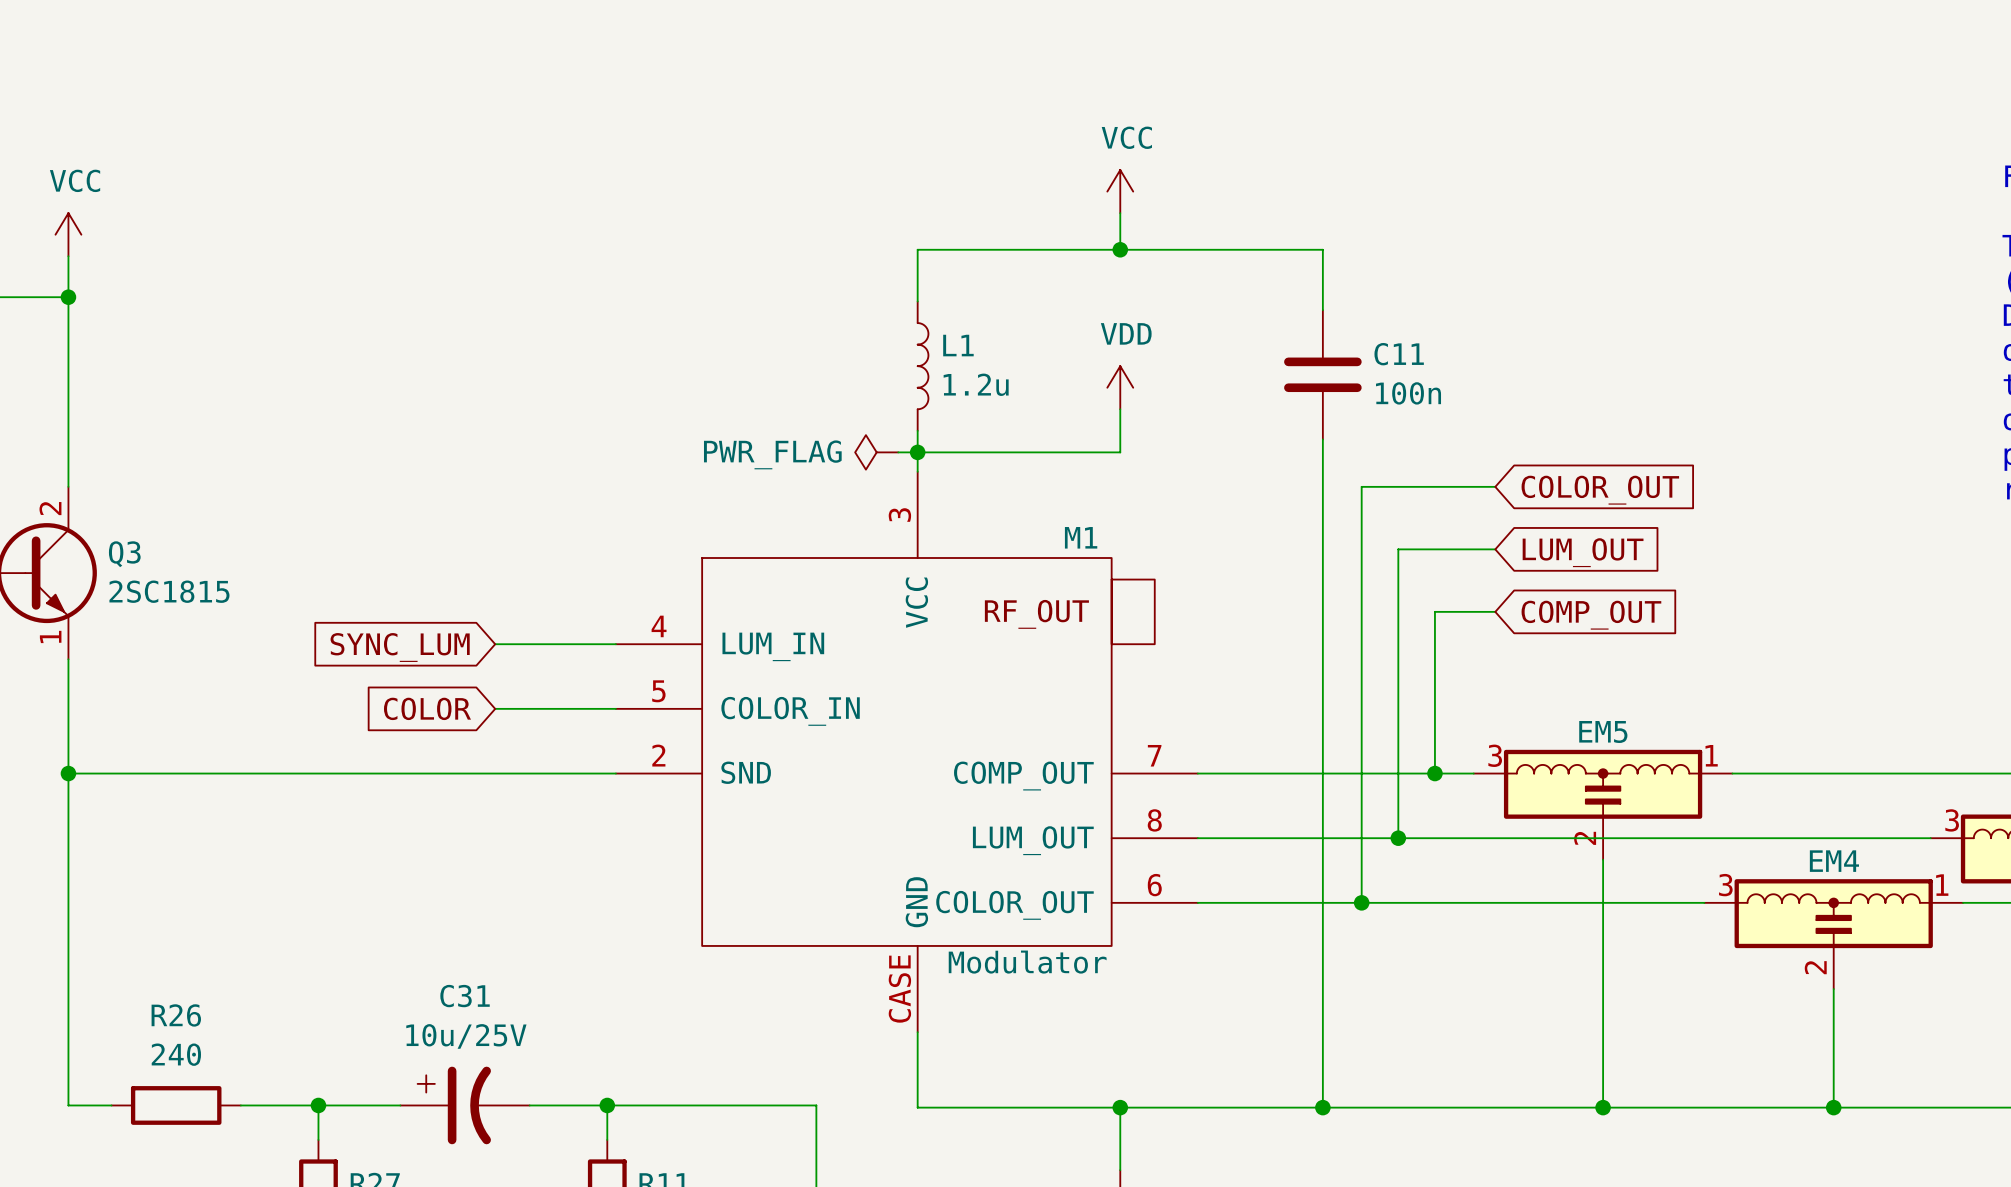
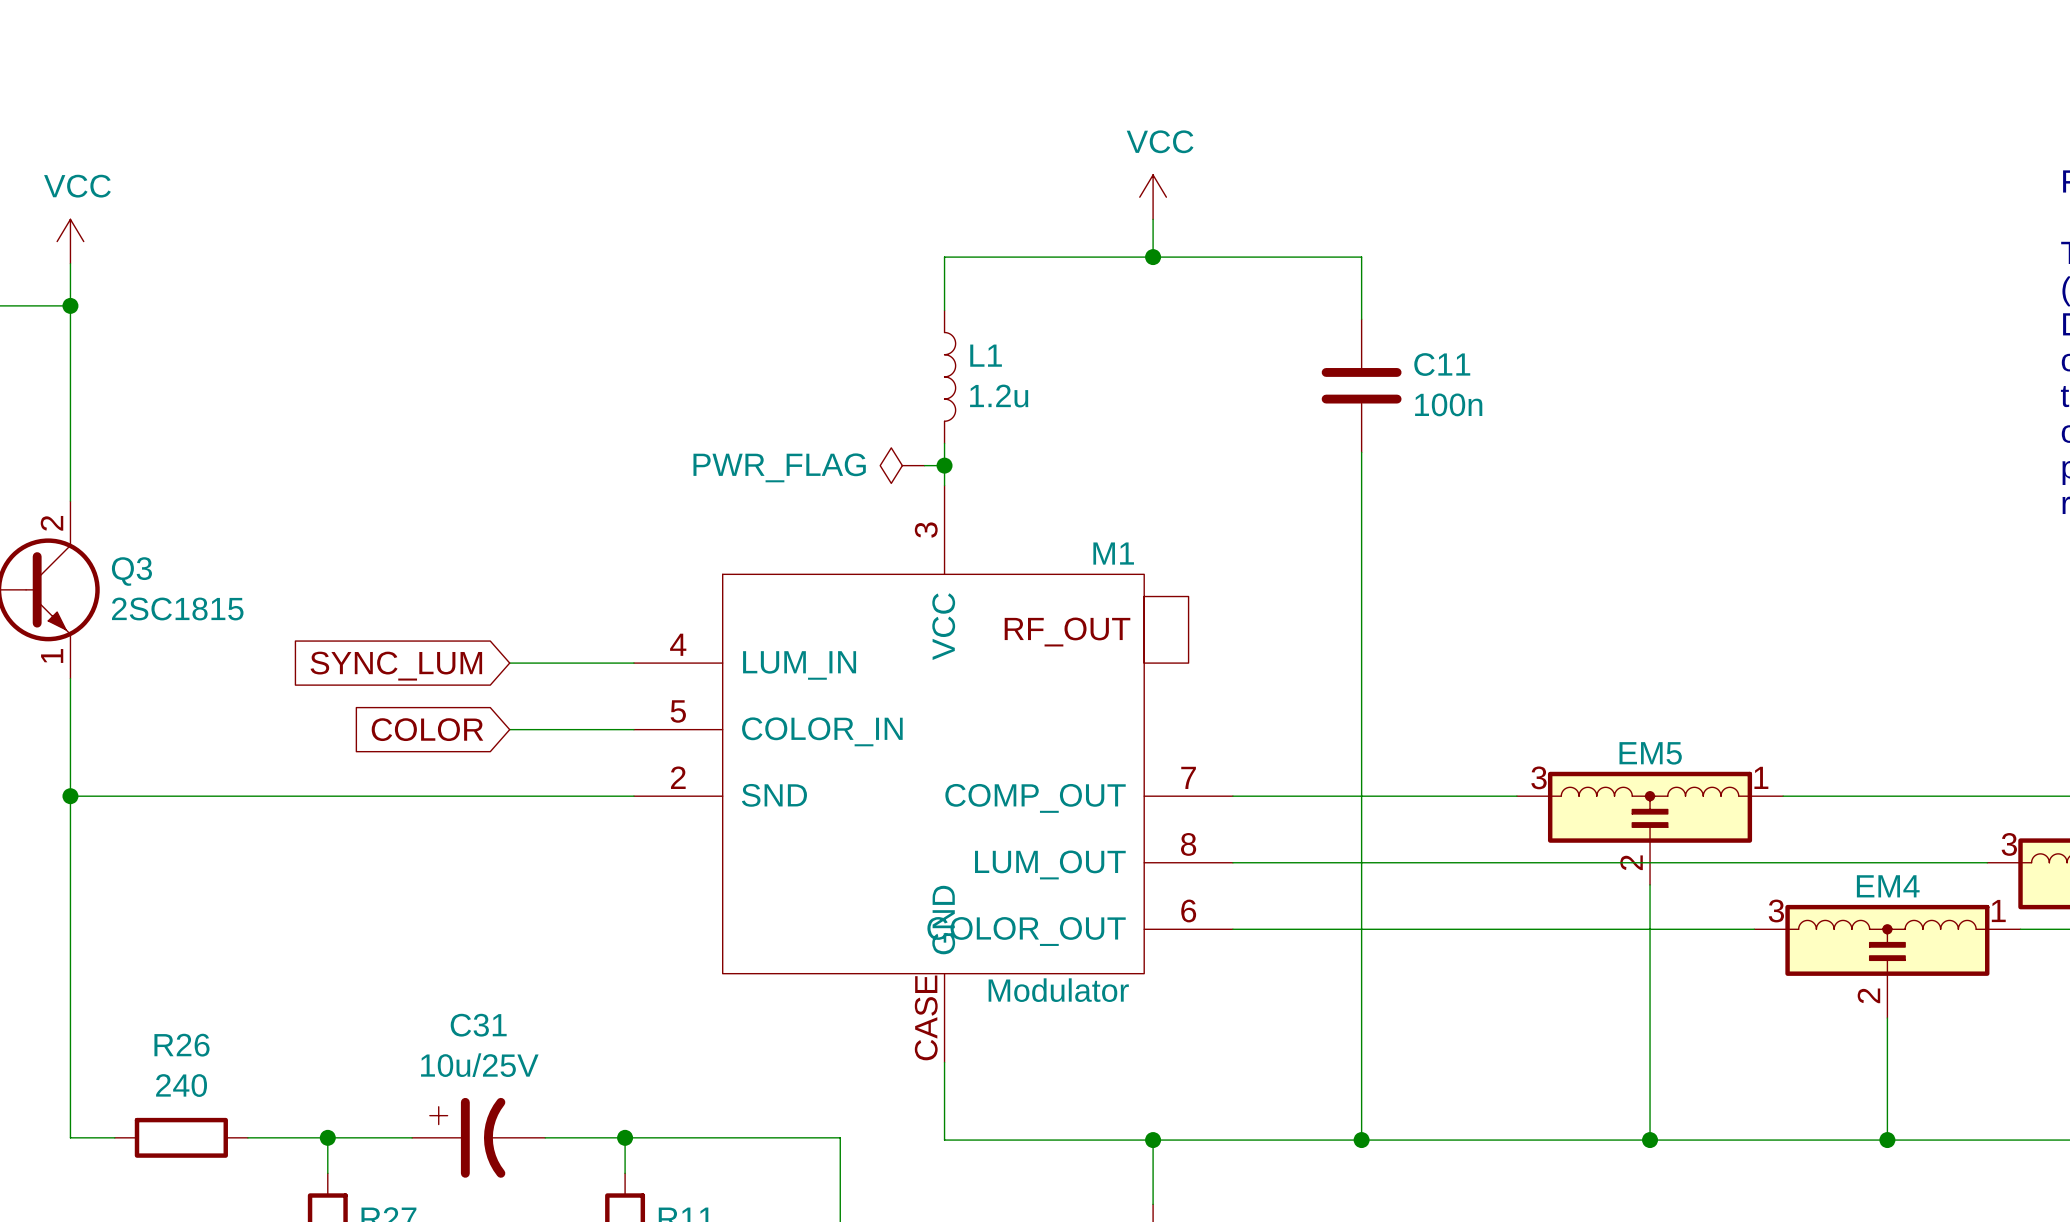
power symbol: VDD (1120, 387) -> none
wire: (1120, 409) (1120, 452) (917, 452) -> none
wire: (1495, 486) (1361, 486) (1361, 902) -> none
global label: COLOR_OUT (1600, 490) -> none
wire: (1495, 549) (1398, 549) (1398, 838) -> none
global label: LUM_OUT (1583, 552) -> none
wire: (1495, 611) (1434, 611) (1434, 773) -> none
global label: COMP_OUT (1591, 615) -> none
junction: (1434, 773) -> none
junction: (1398, 838) -> none
junction: (1361, 902) -> none

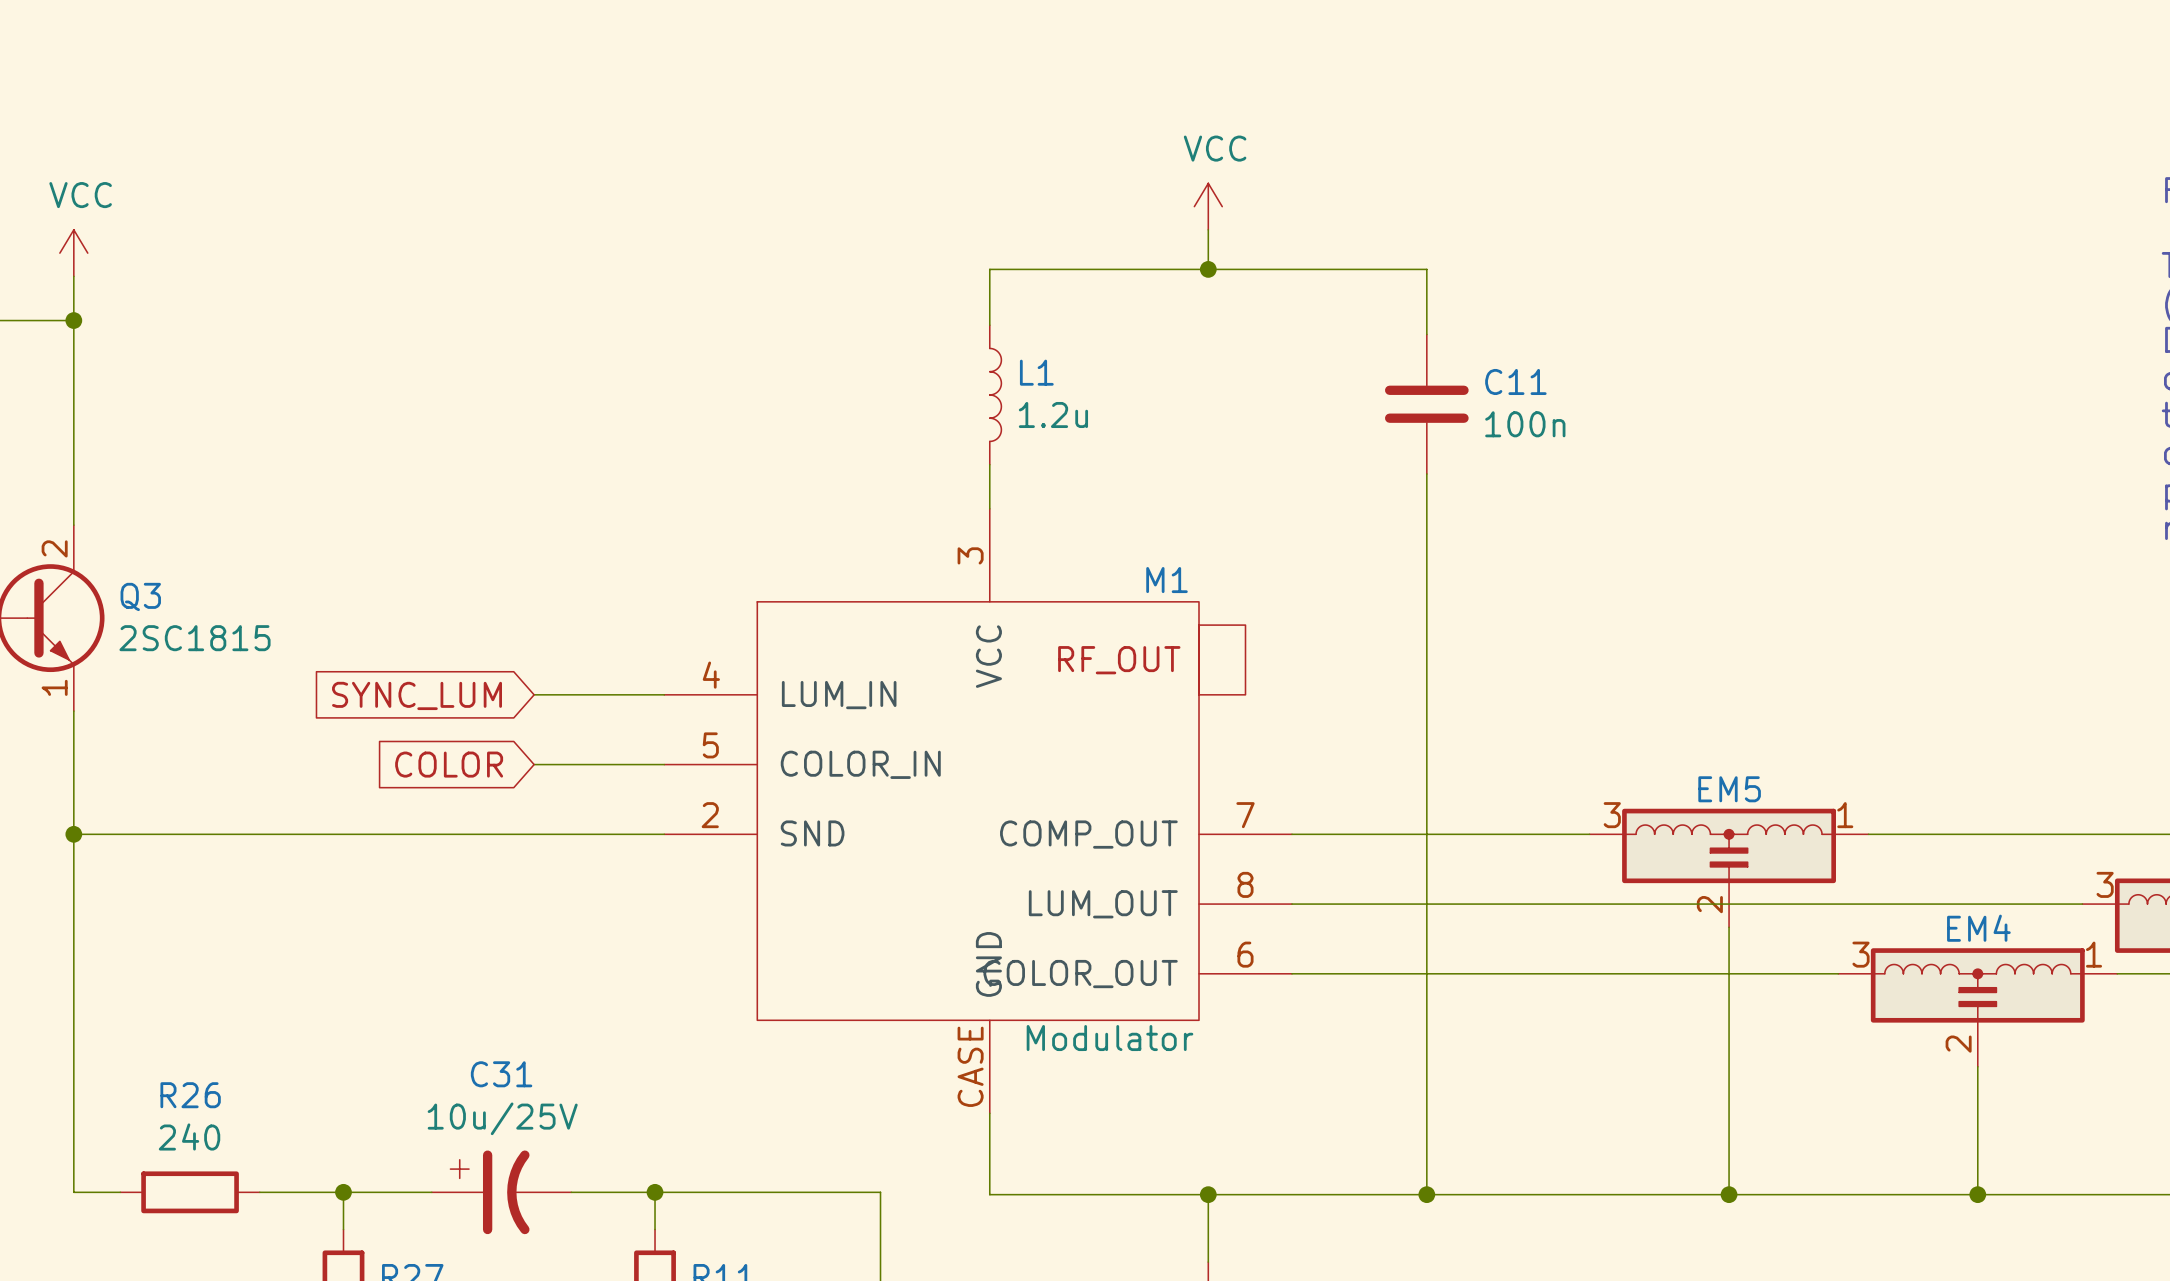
power symbol: PWR_FLAG (902, 465) -> none
wire: (924, 465) (944, 465) -> none
junction: (944, 465) -> none

